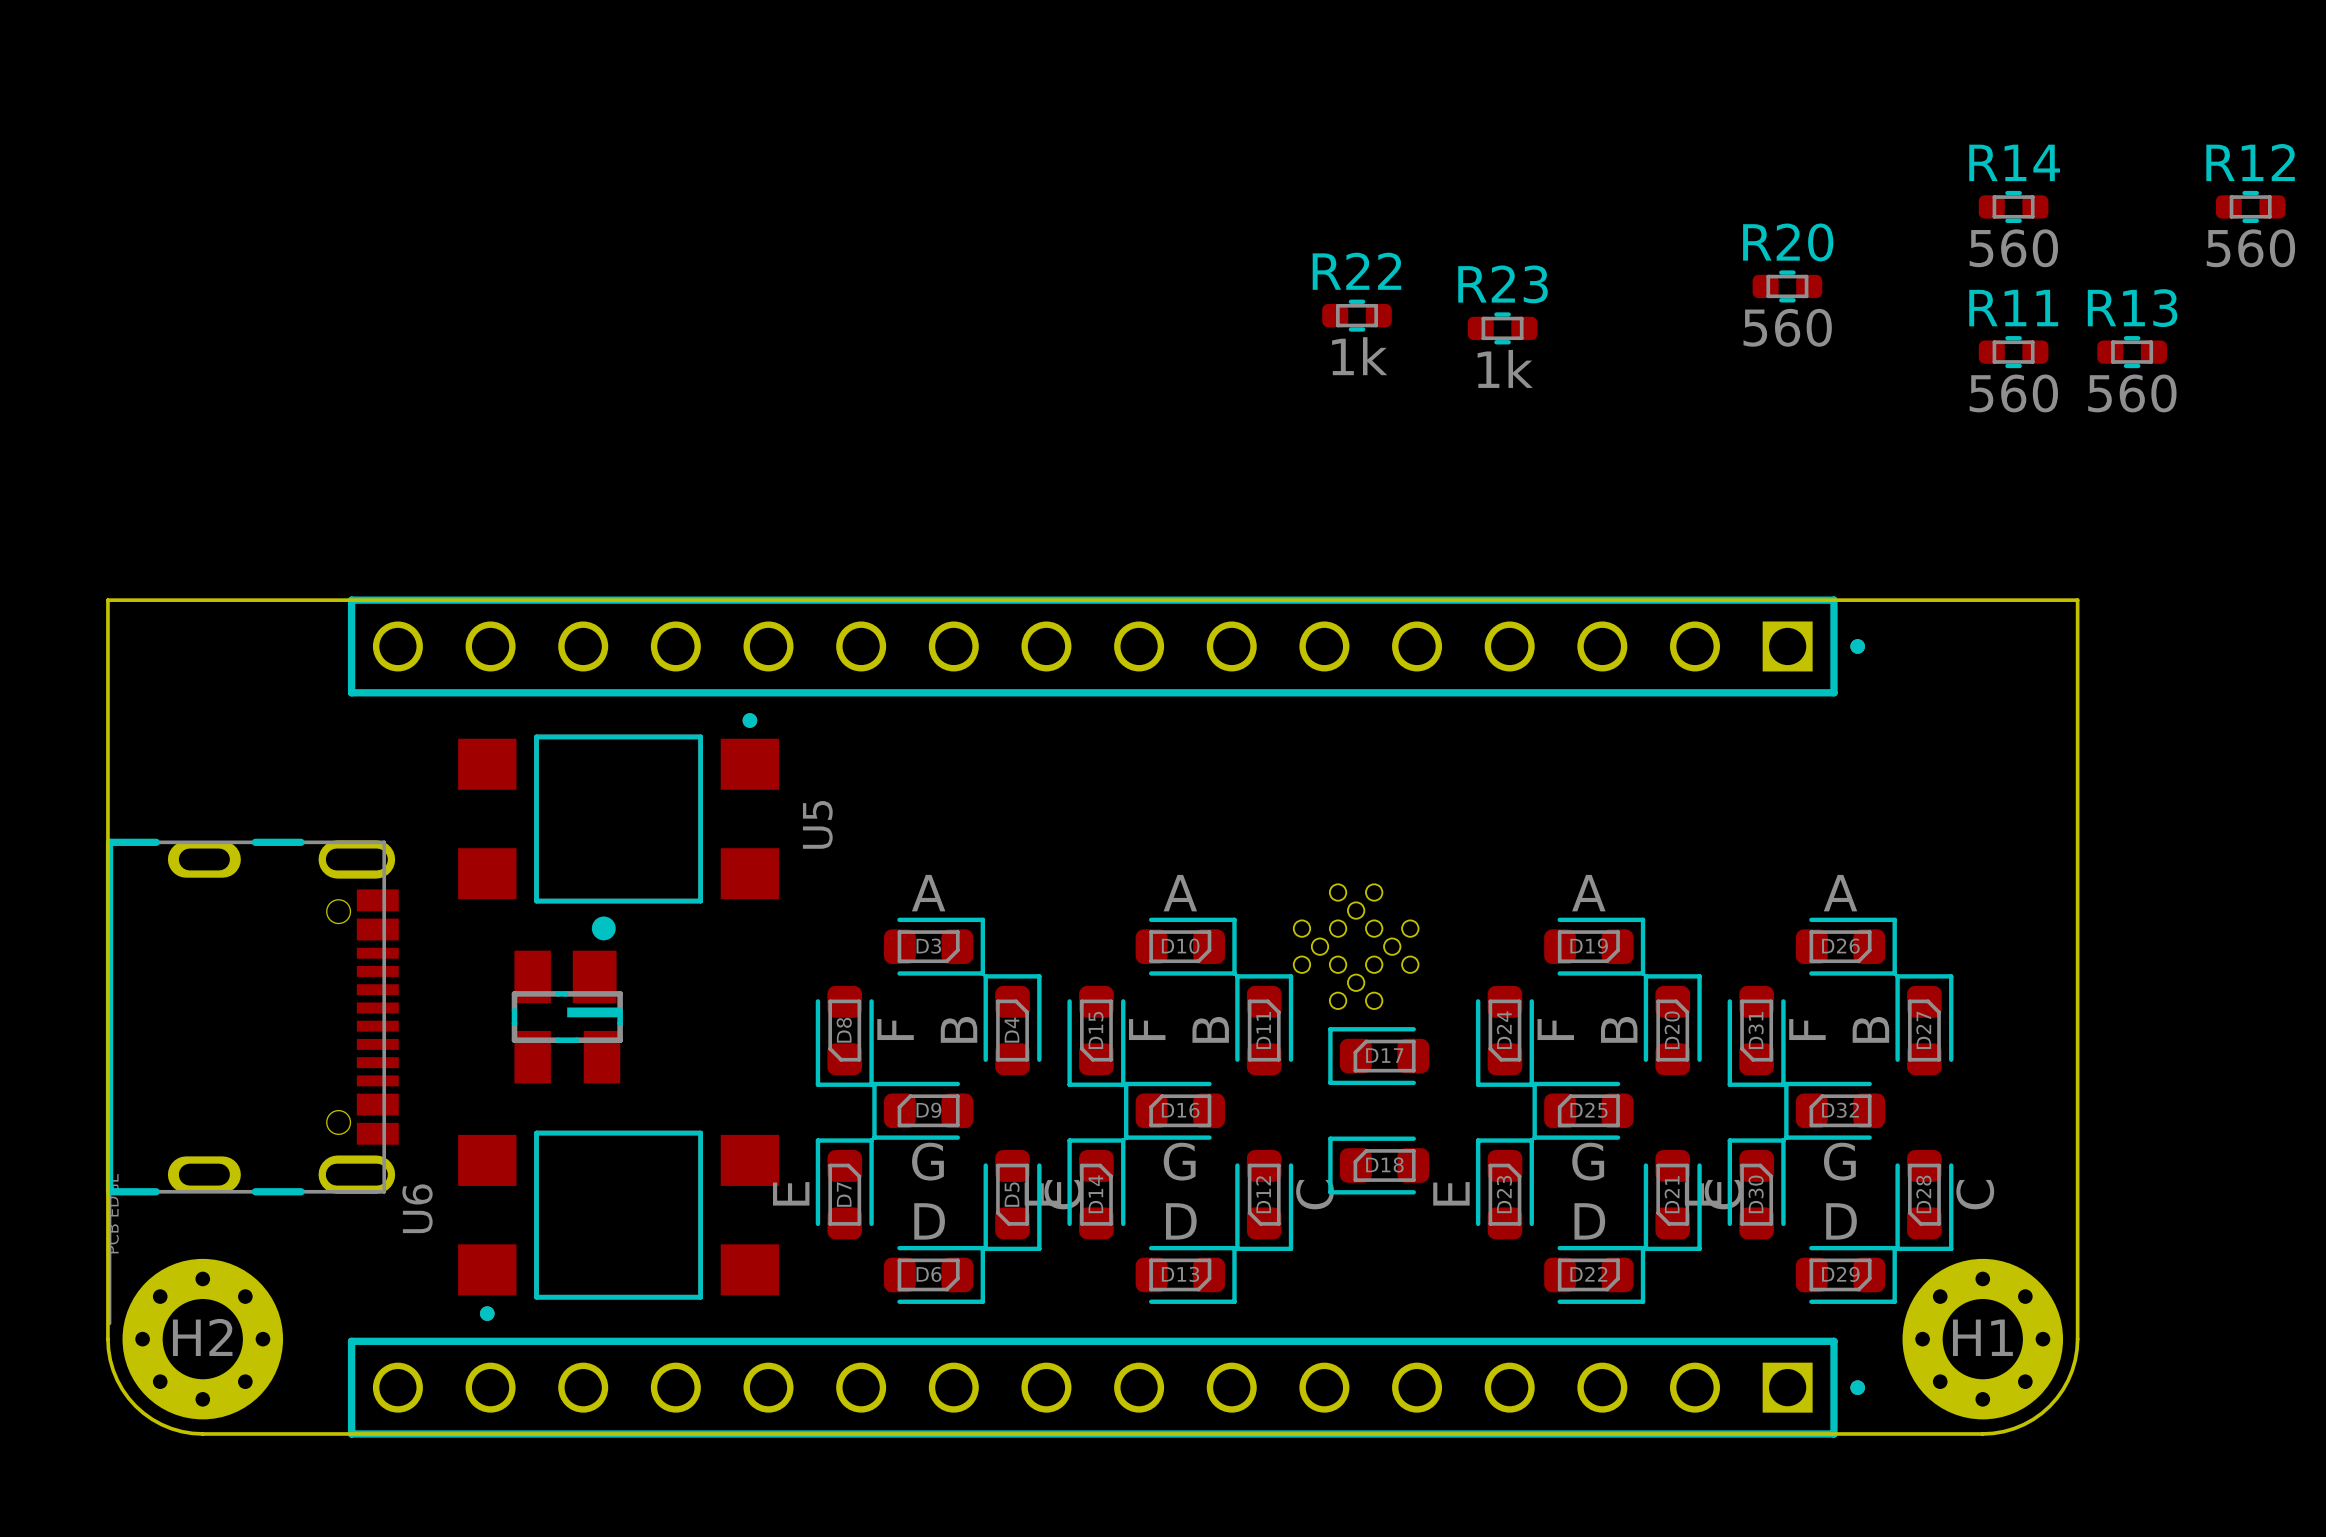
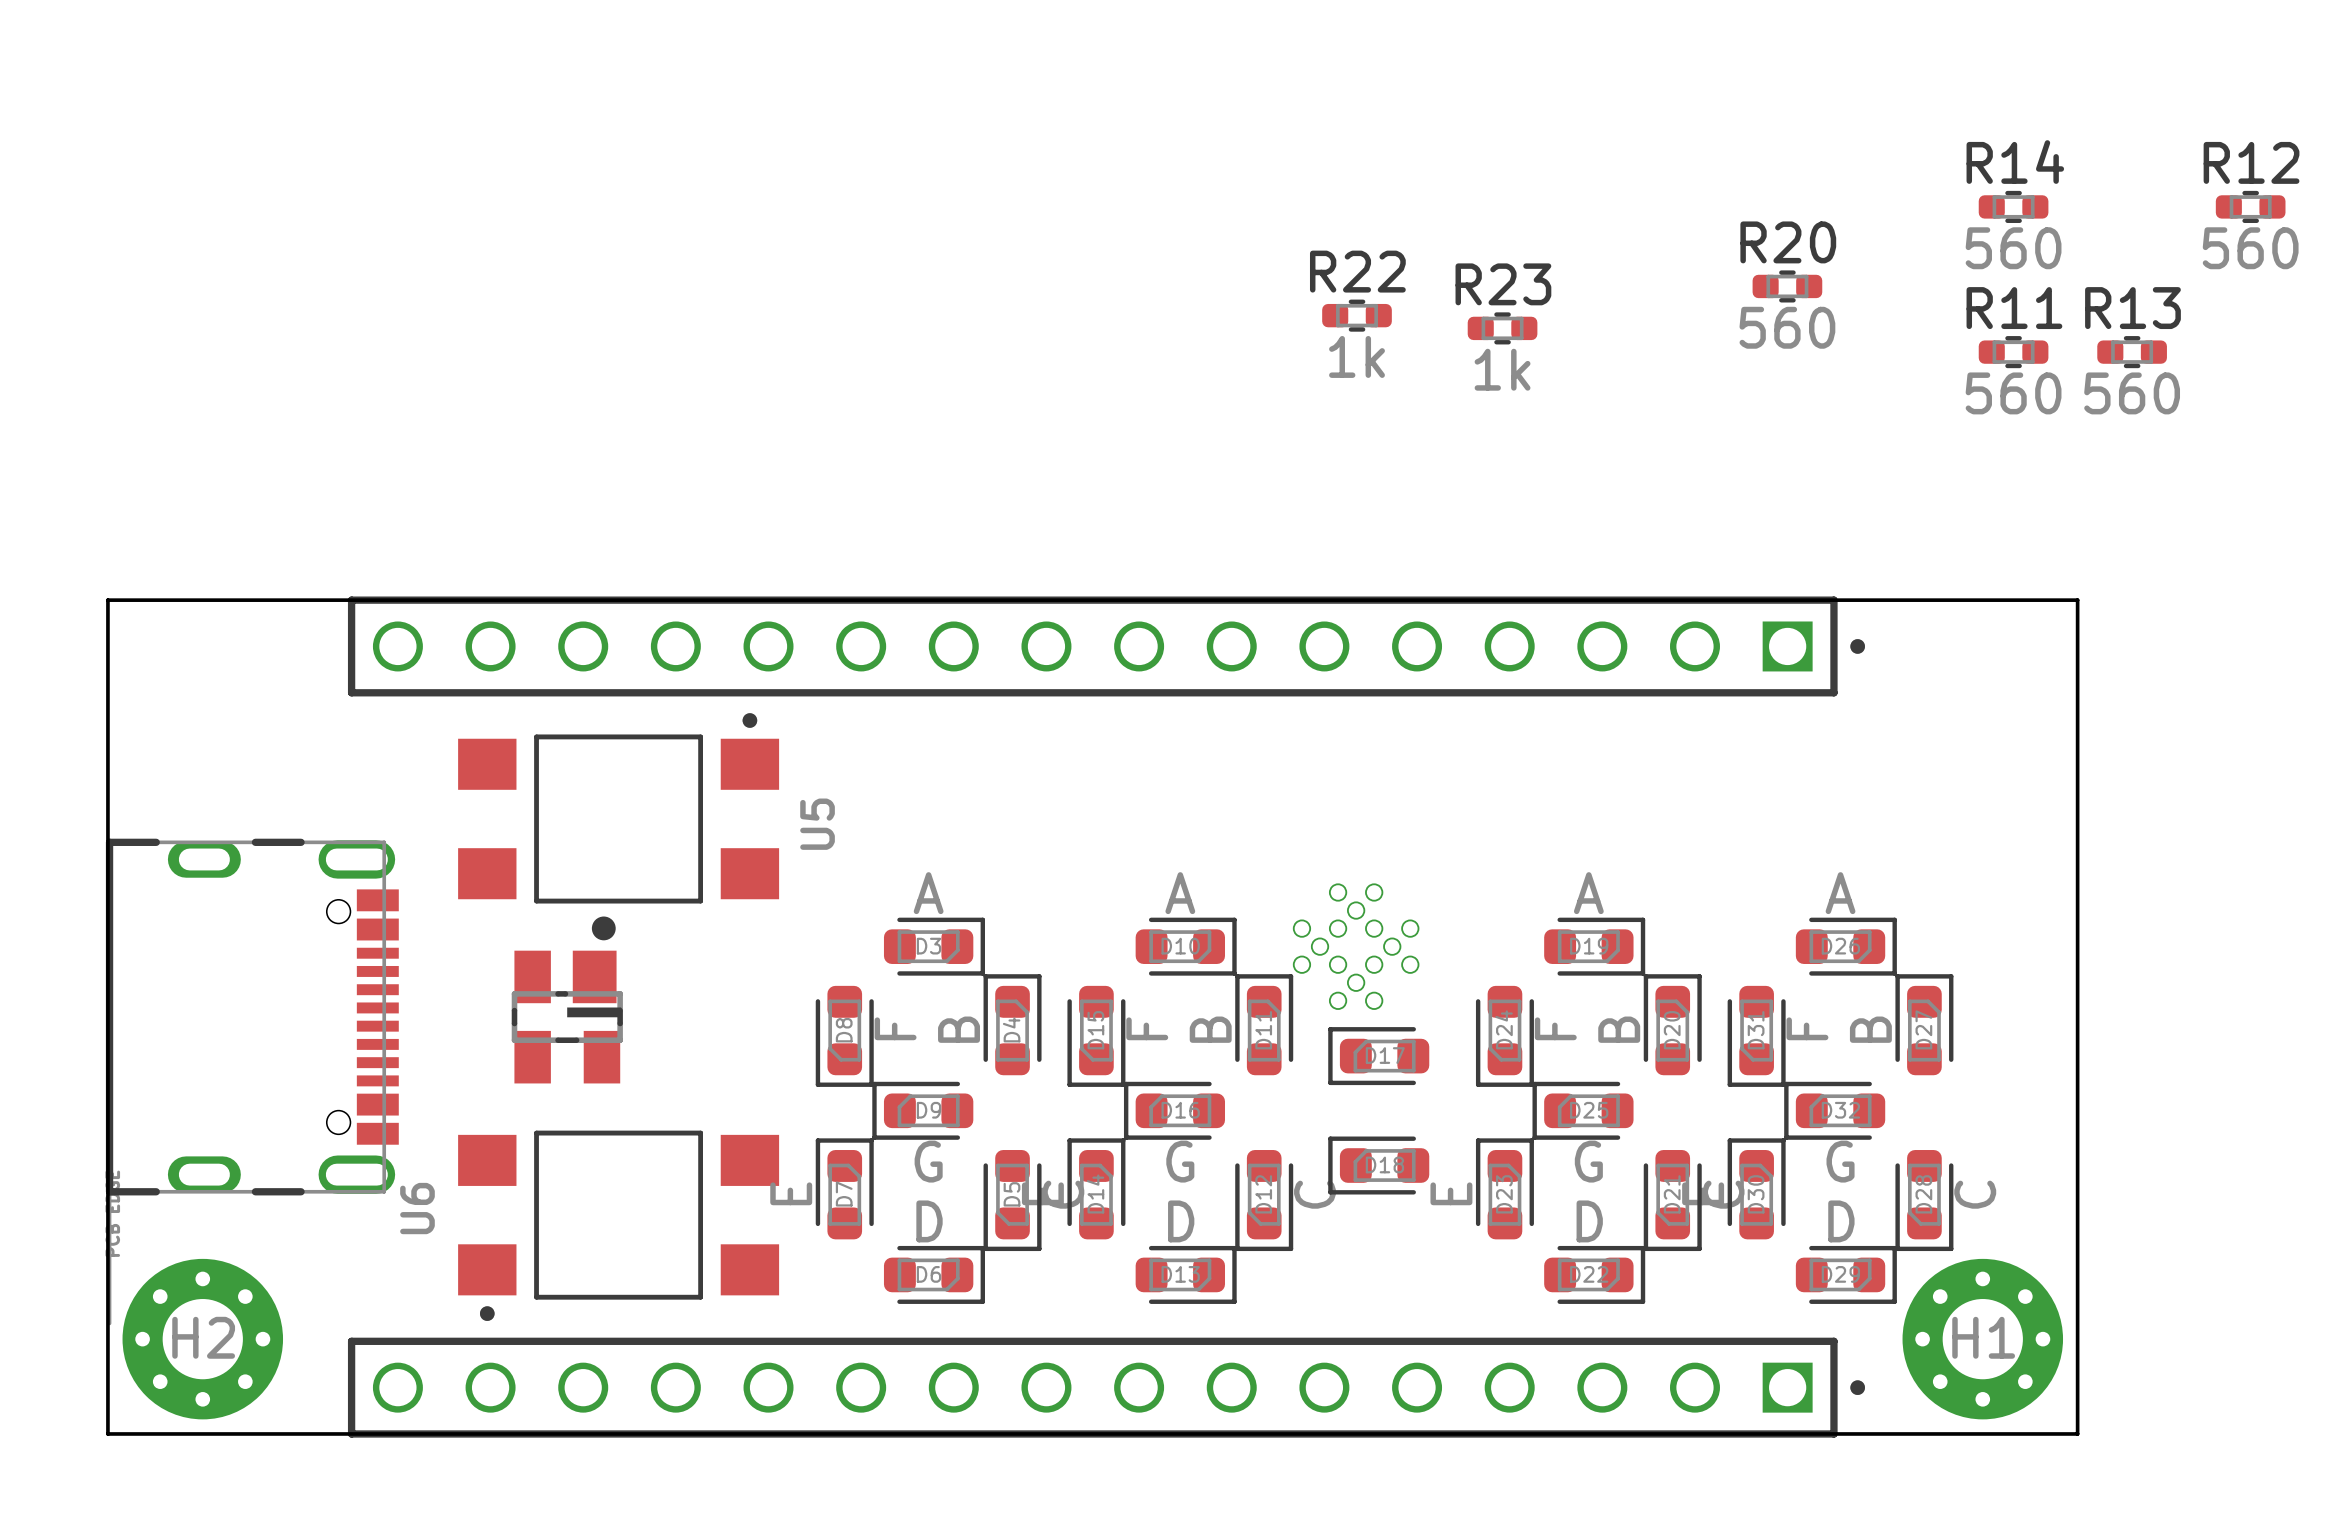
board edge: (107, 1339) (110, 1360) (117, 1380) (135, 1406) (152, 1419) (171, 1428) (202, 1433) -> (107, 1339) (107, 1433) (202, 1433)
board edge: (2077, 1339) (2075, 1360) (2068, 1380) (2049, 1406) (2023, 1424) (2003, 1431) (1982, 1433) -> (2077, 1339) (2077, 1433) (1982, 1433)

